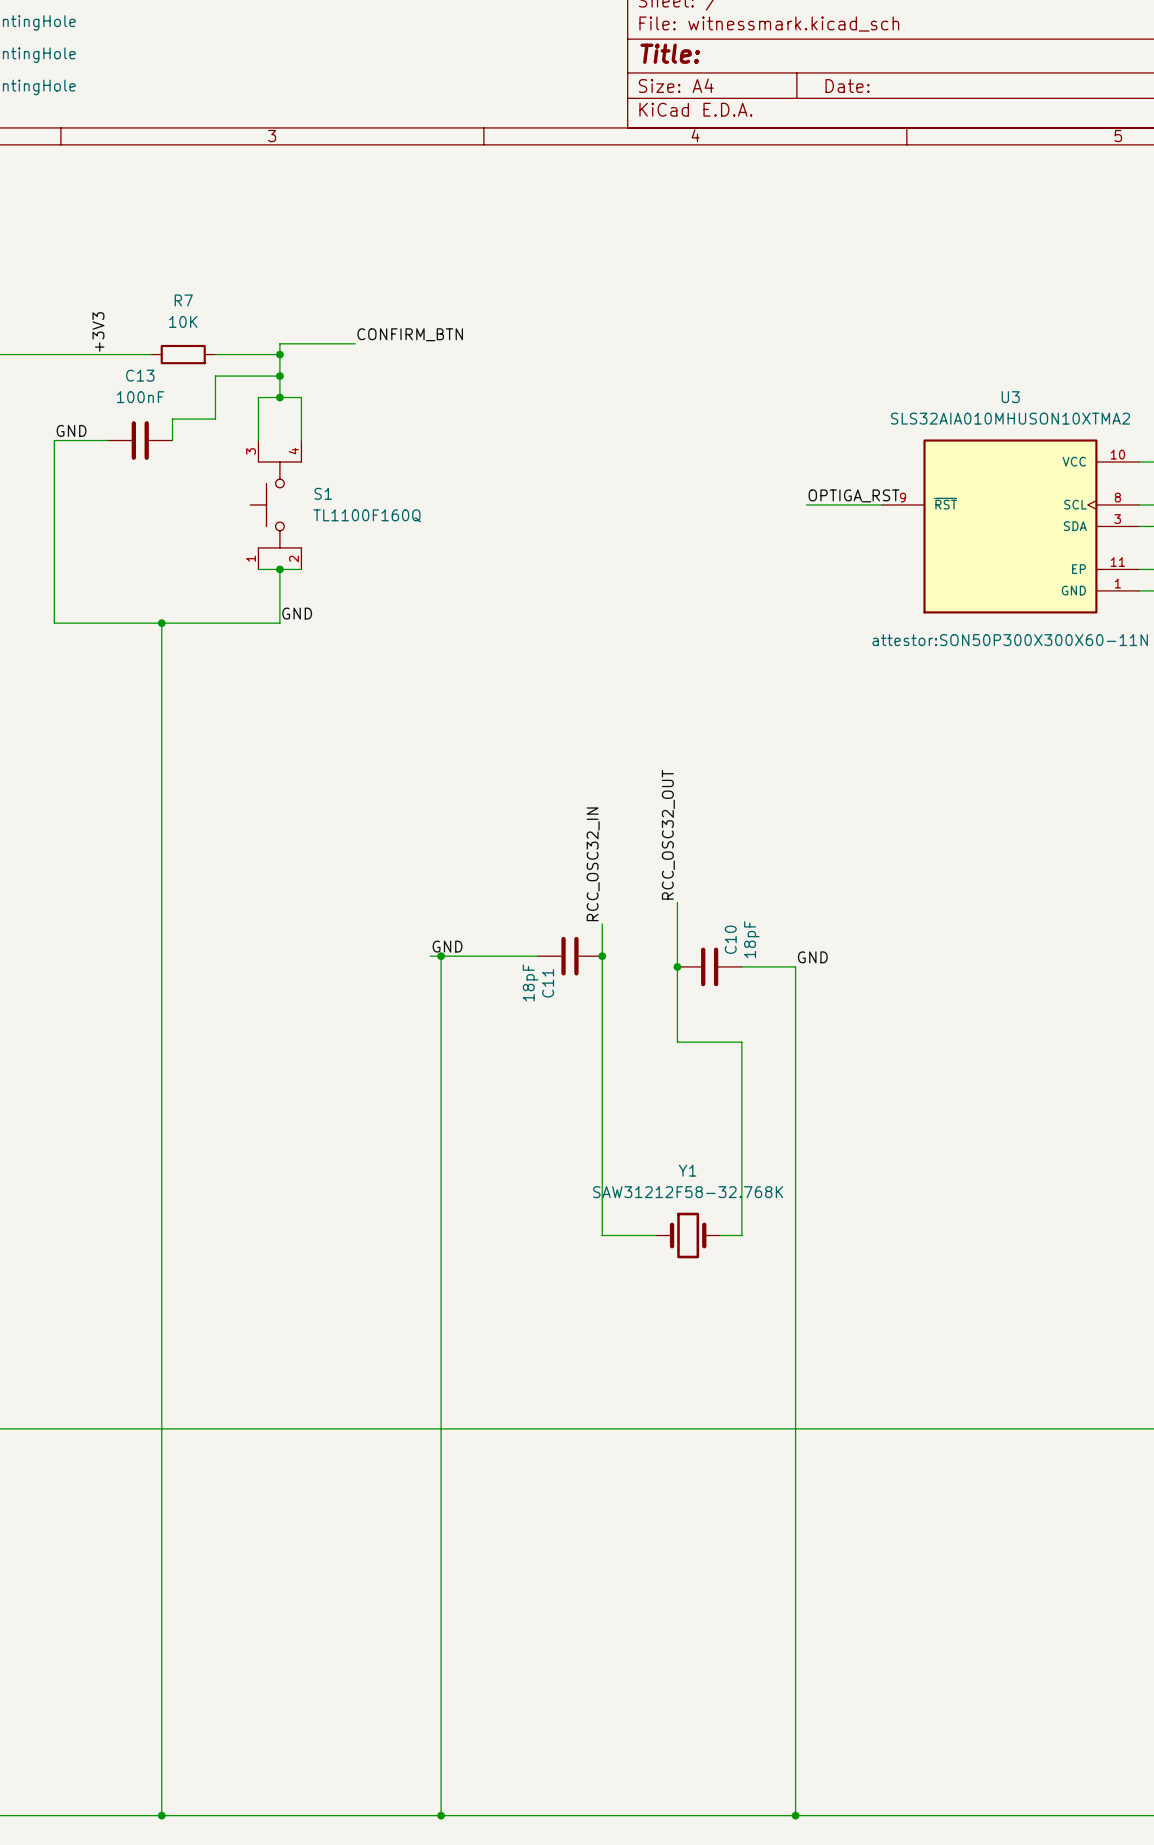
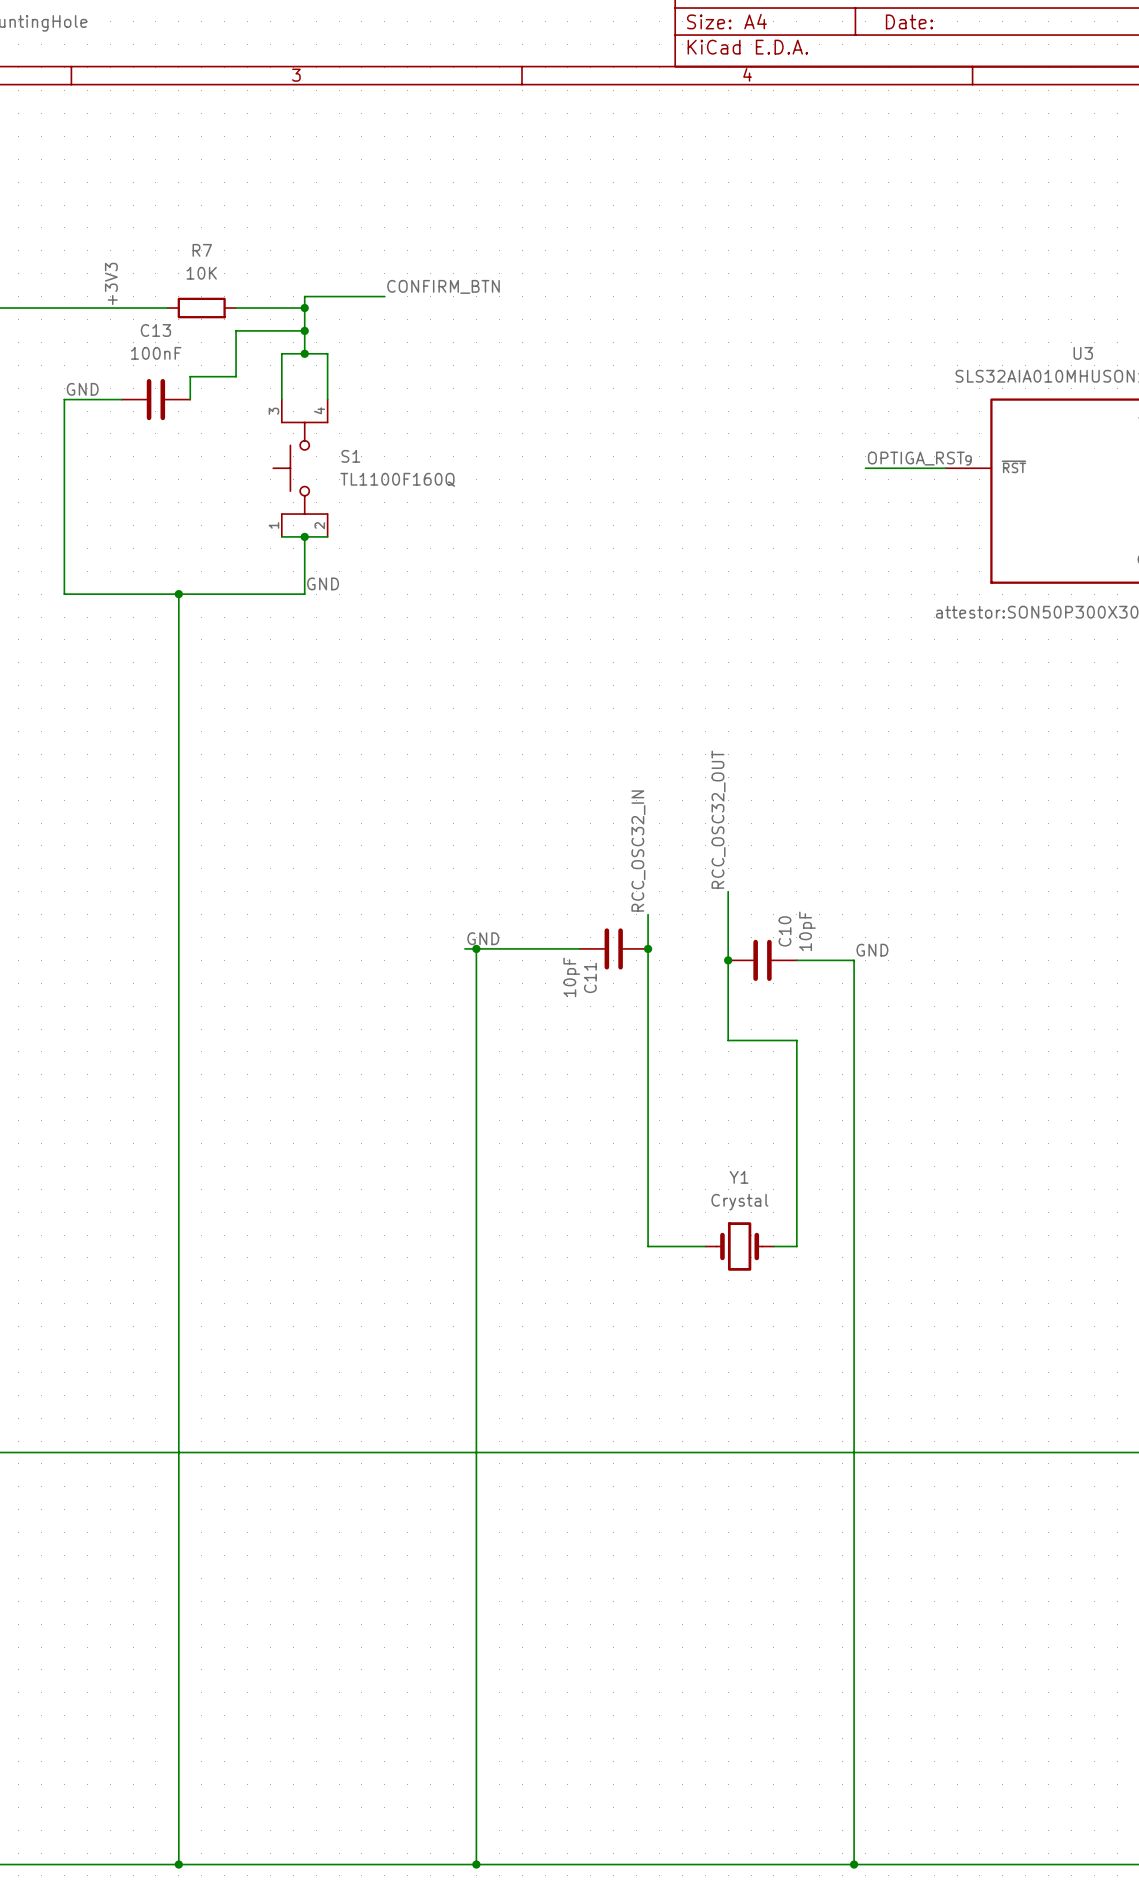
C10 value: 18pF (751, 939) -> 10pF (807, 931)
C11 value: 18pF (530, 982) -> 10pF (571, 977)
Y1 value: SAW31212F58-32.768K (688, 1192) -> Crystal (739, 1202)

